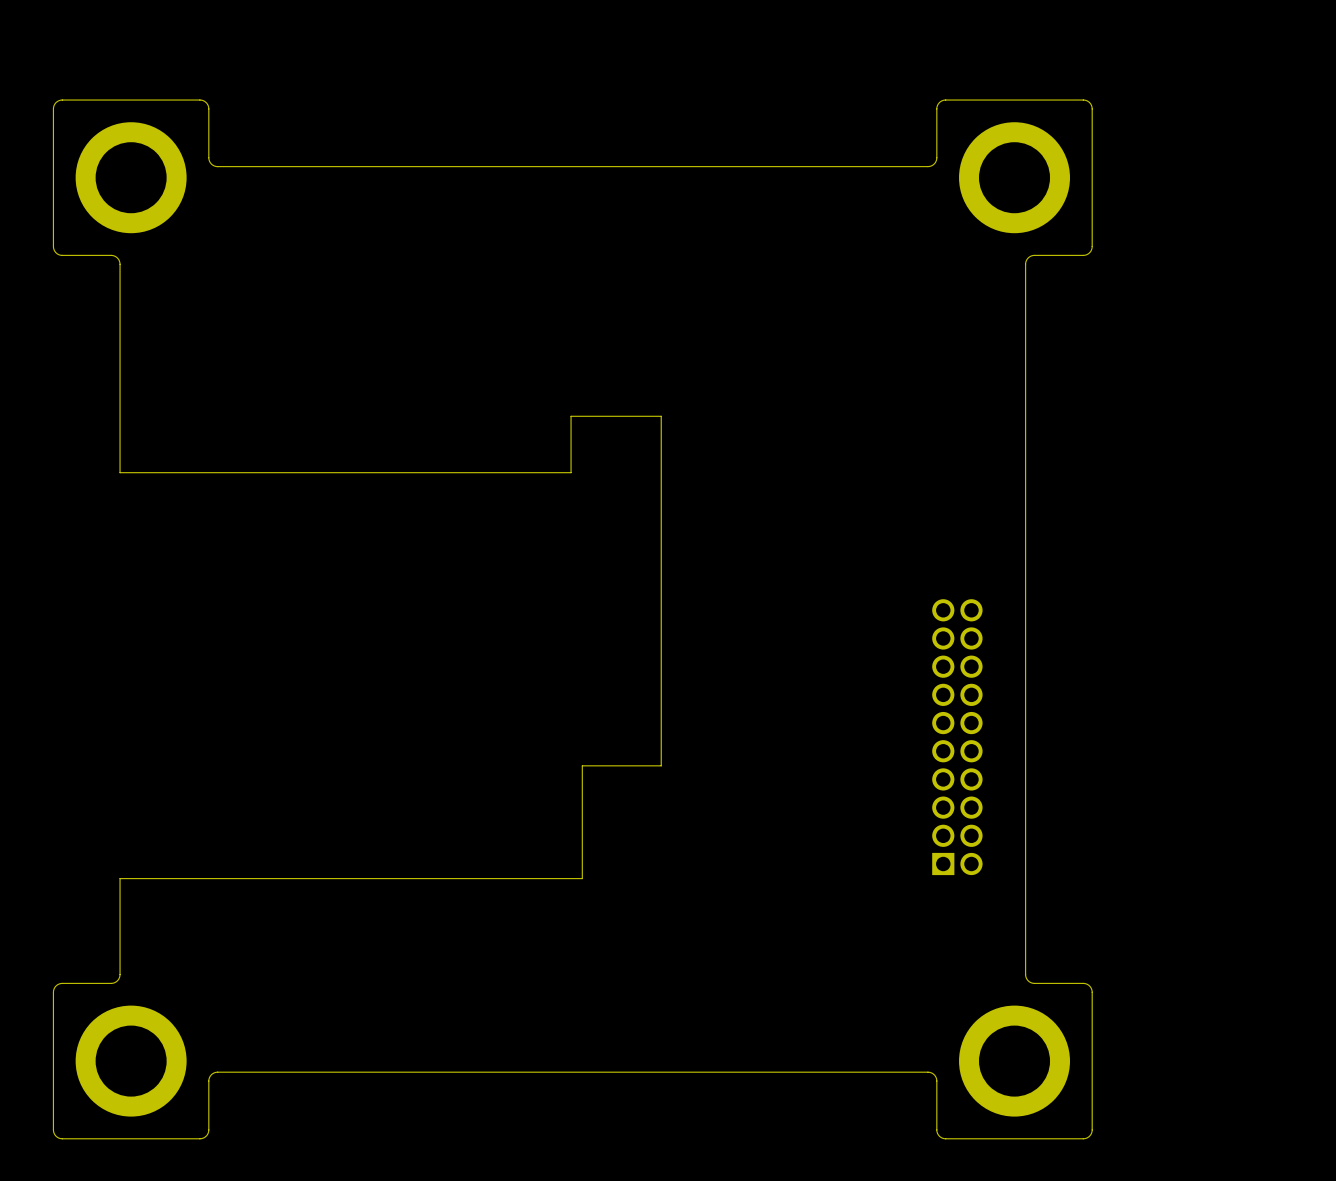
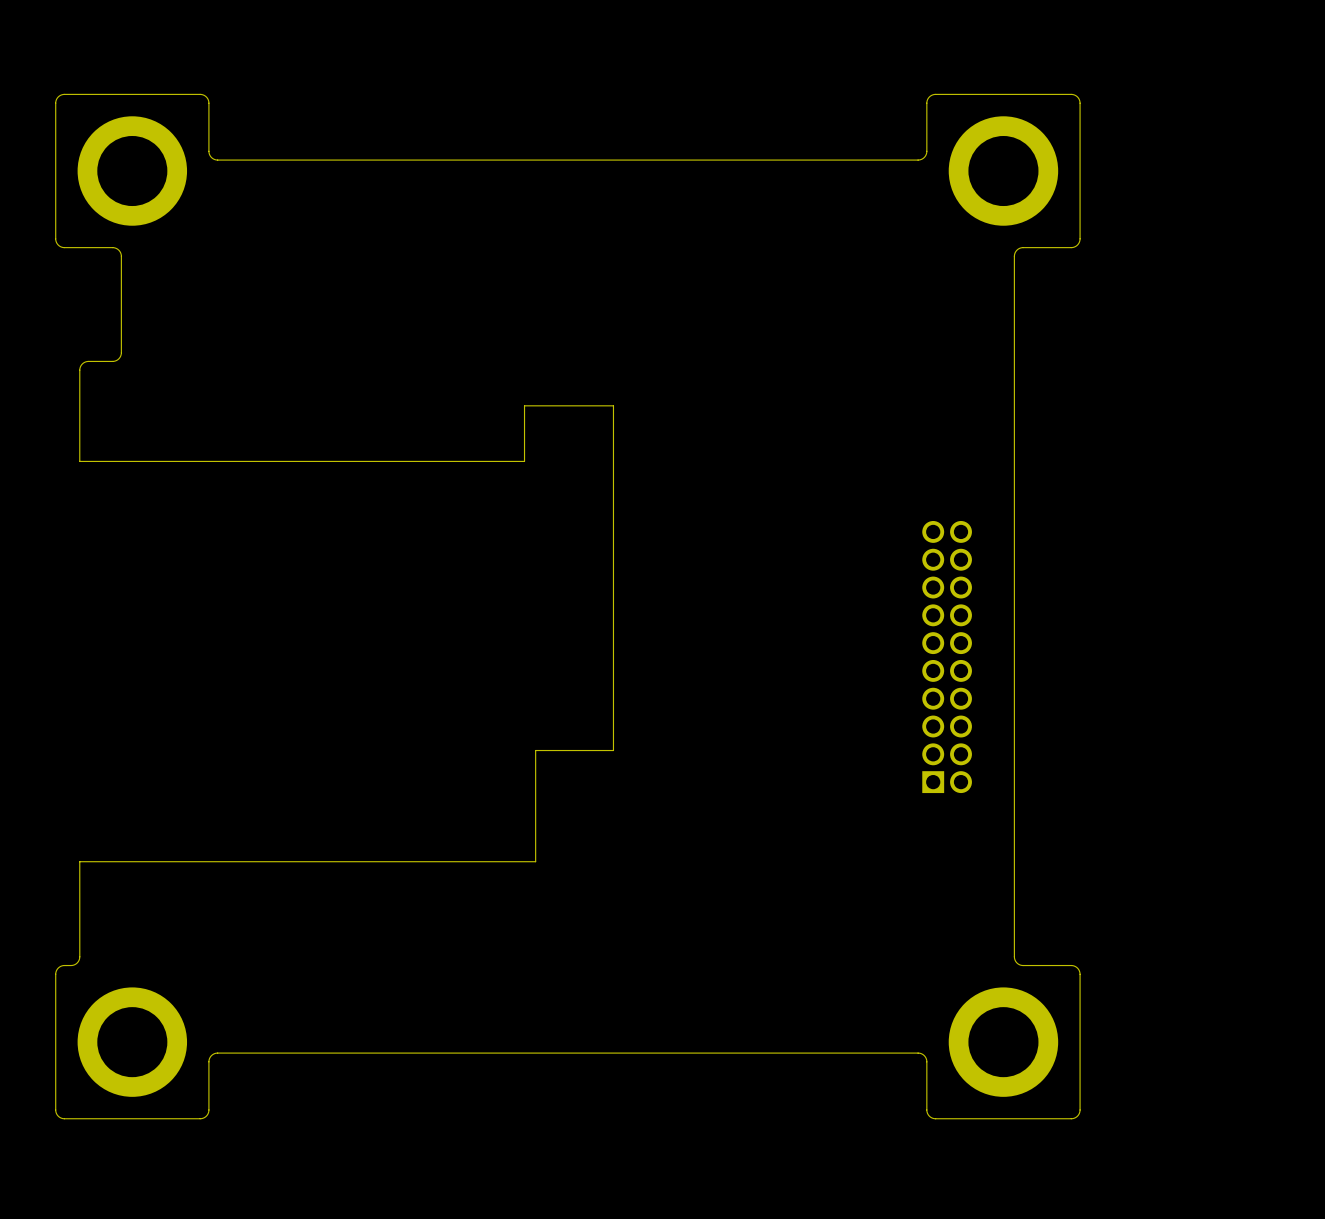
board edge: (120, 361) (120, 472) -> (121, 352) (115, 360) (87, 361) (80, 366) (79, 461)
part position: (390, 647) -> (346, 633)
part position: (957, 737) -> (947, 657)
board edge: (120, 878) (119, 977) (112, 983) (68, 983) -> (79, 861) (79, 957) (77, 962) (71, 965)

